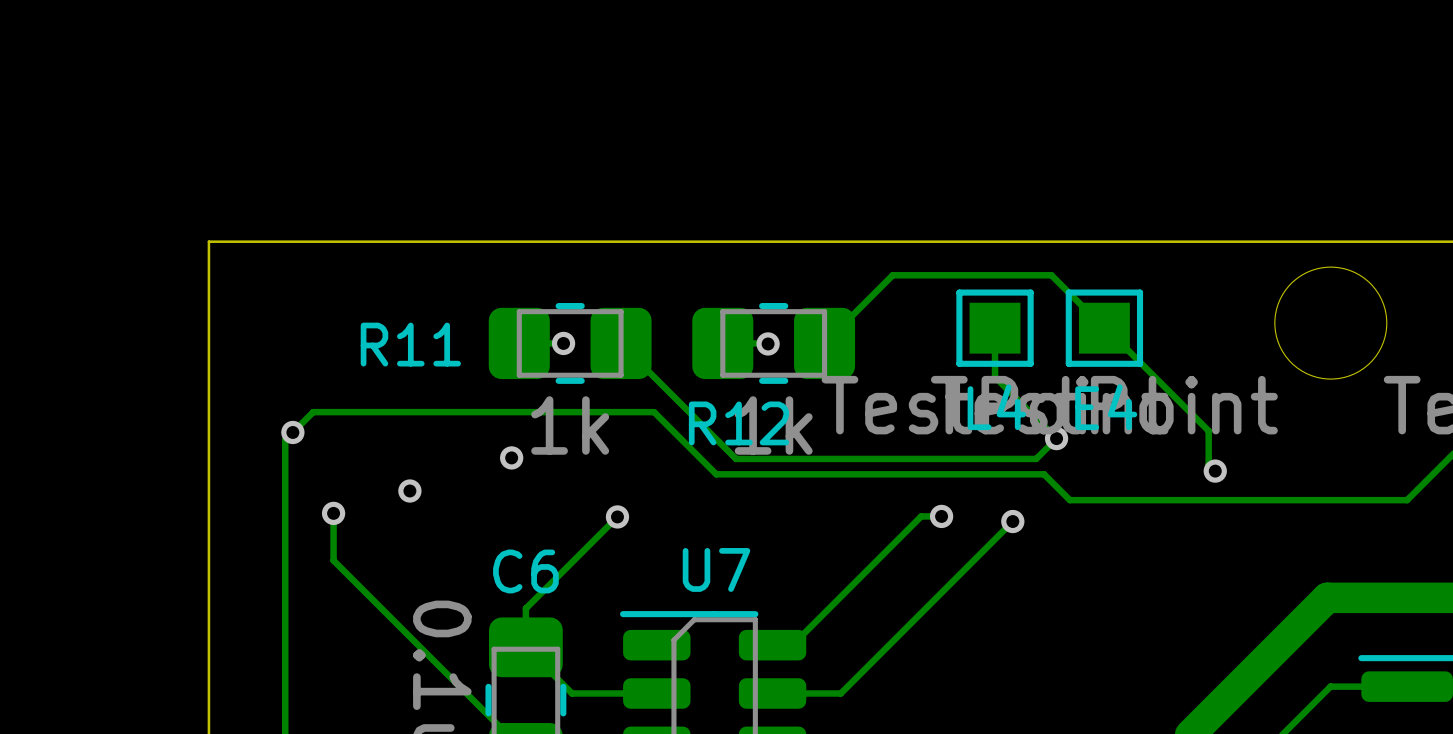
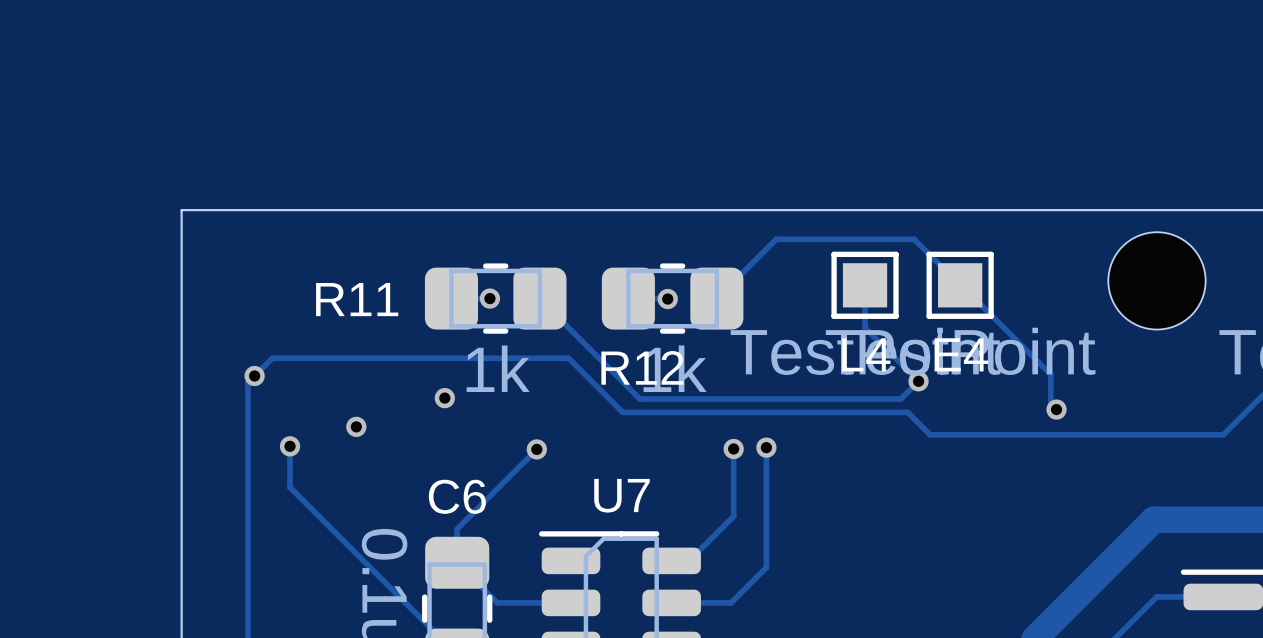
via: none -> (766, 447)
via: none -> (733, 448)
track: (941, 516) (921, 516) (843, 593) -> (733, 448) (733, 516)
via: (941, 516) -> none
track: (1012, 521) (881, 652) -> (766, 447) (766, 567)
via: (1012, 521) -> none

